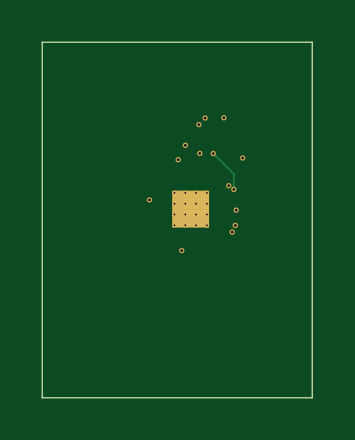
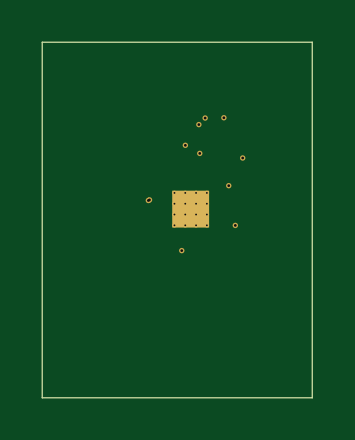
track: (213, 153) (233, 174) (233, 189) -> none
via: (213, 153) -> none
via: (178, 159) -> none
via: (233, 189) -> none
via: none -> (148, 200)
via: (236, 210) -> none
via: (232, 232) -> none

